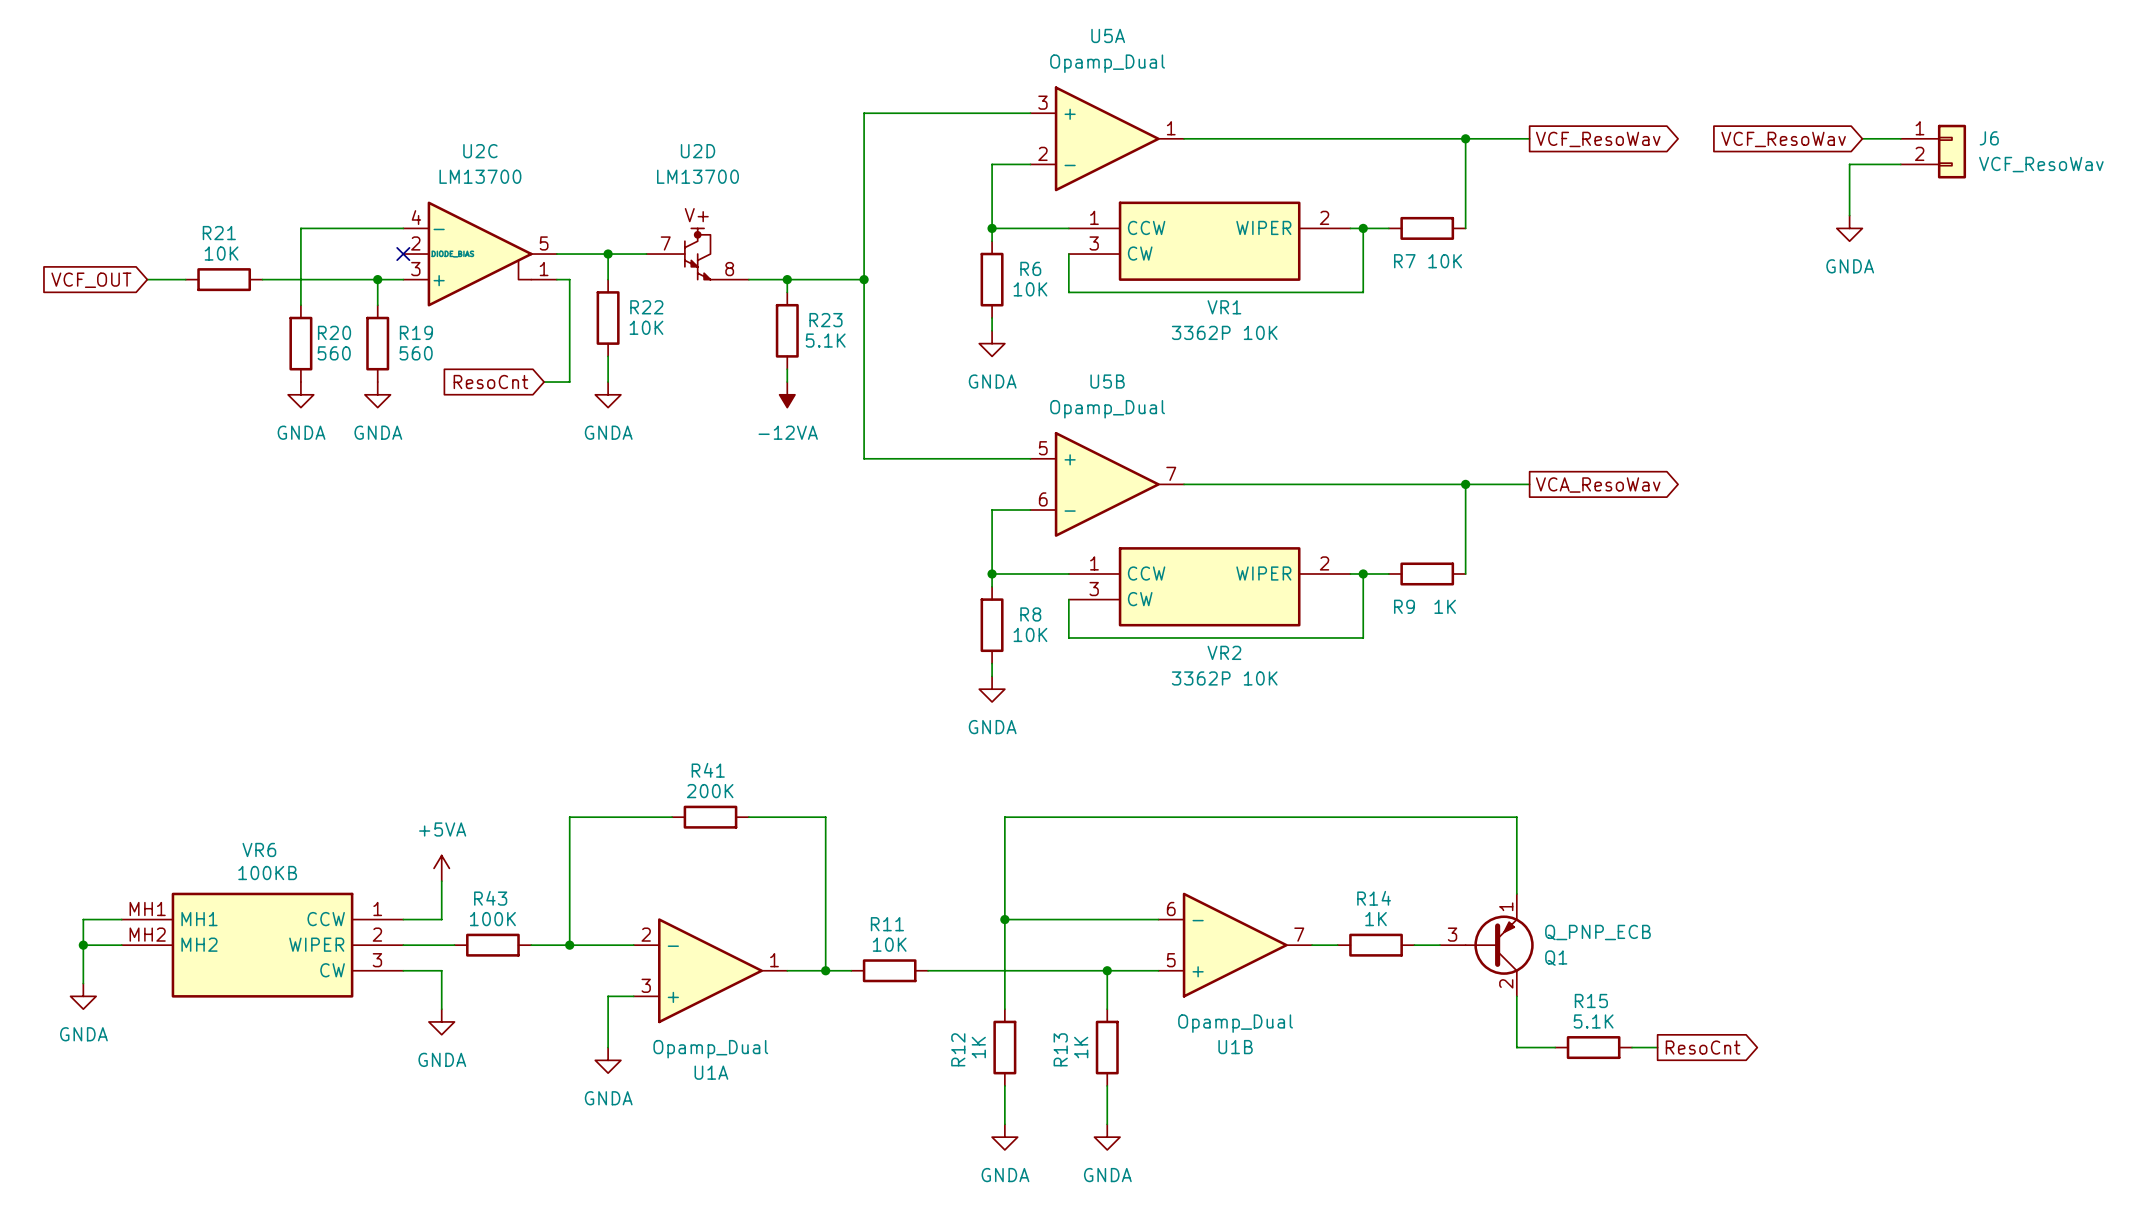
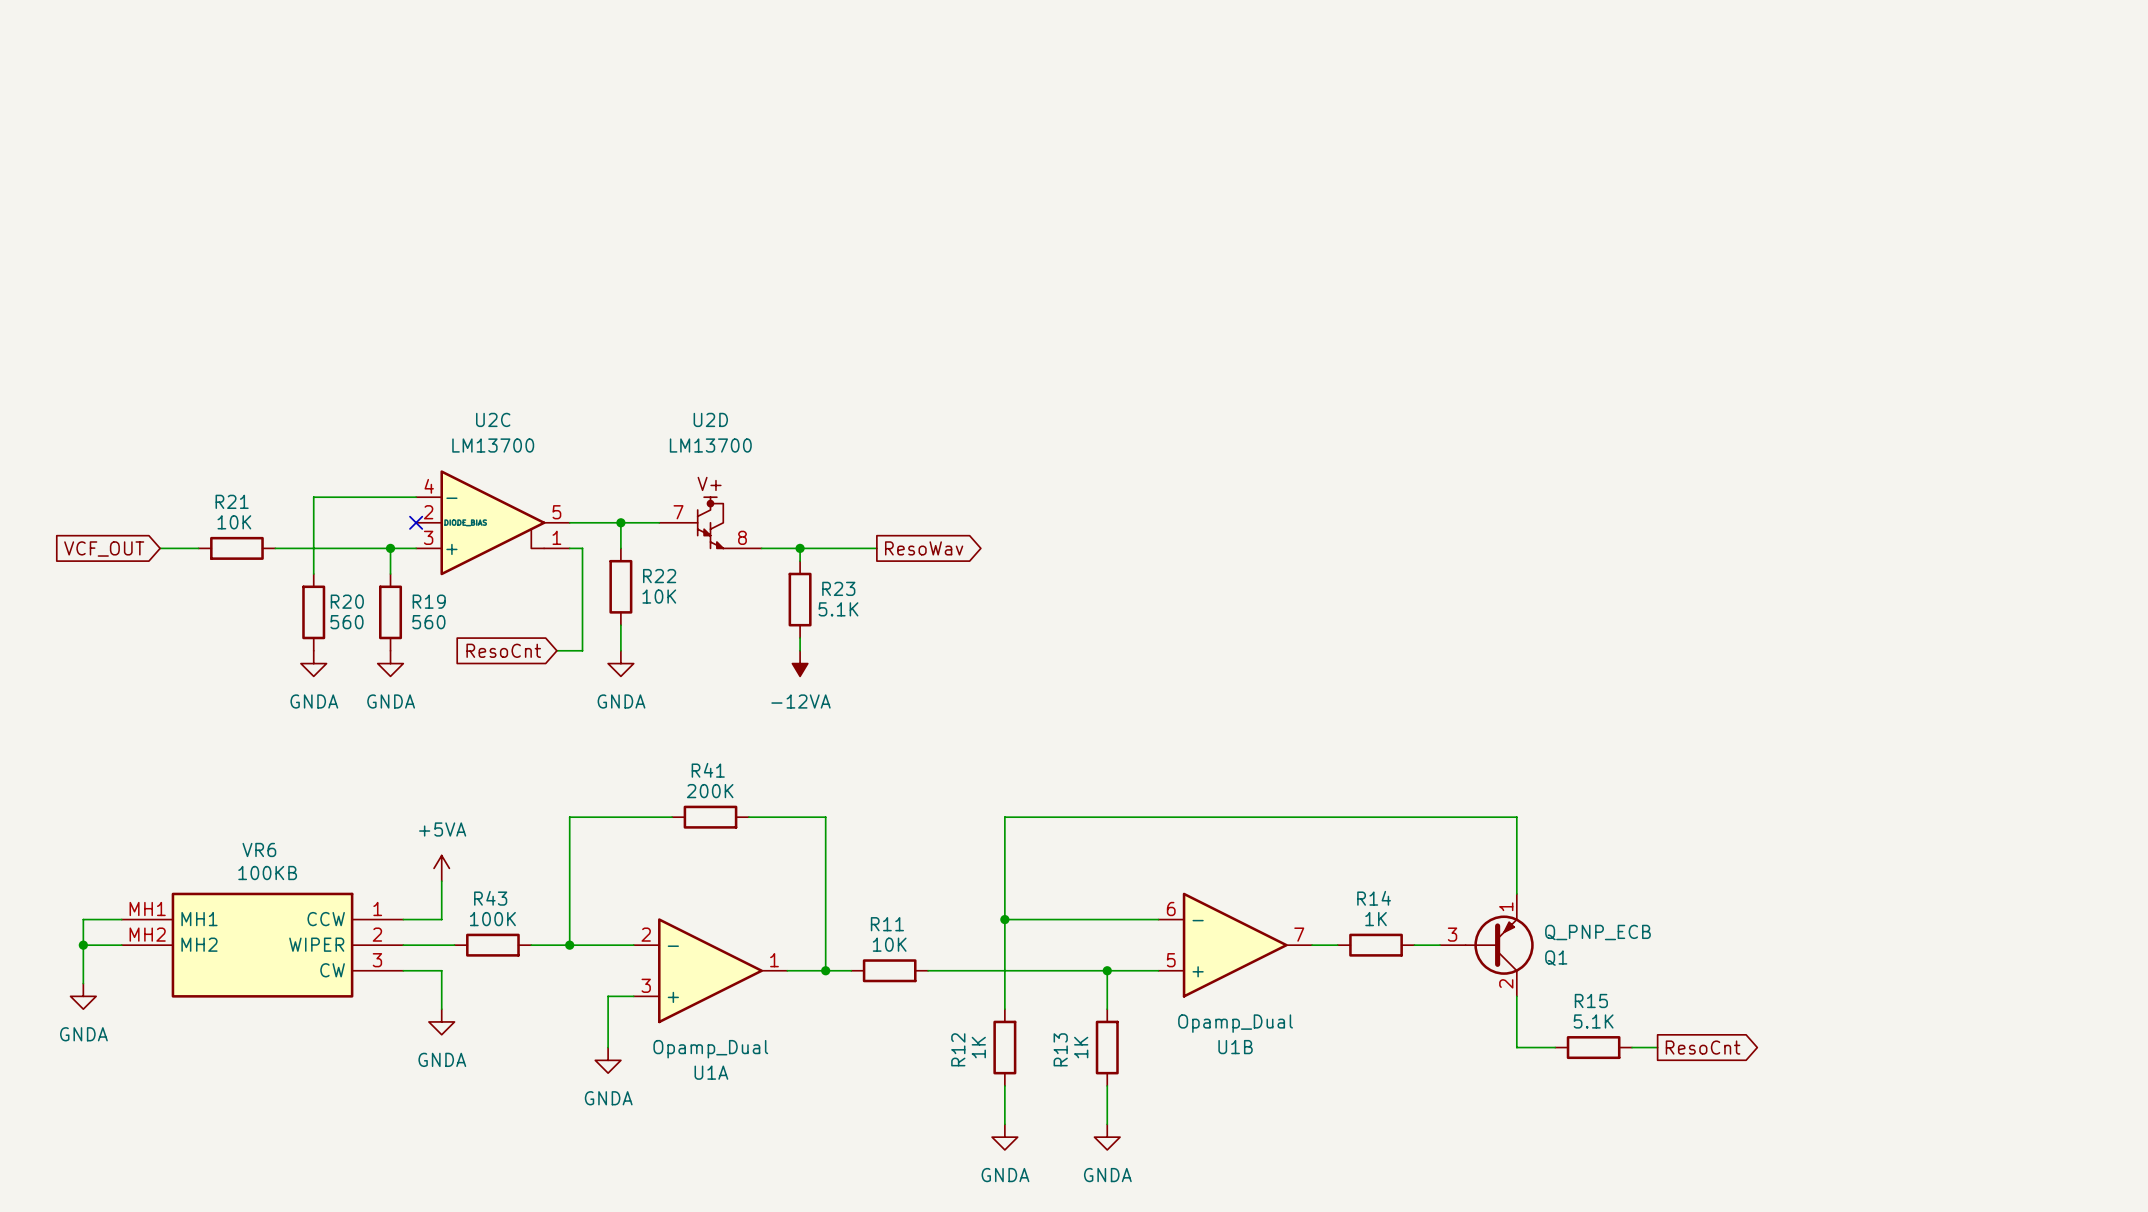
wire: (1030, 113) (864, 113) (864, 458) (1030, 458) -> none
U5A: Opamp_Dual (1107, 138) -> none
wire: (1184, 138) (1529, 138) -> none
wire: (1465, 138) (1465, 228) -> none
junction: (1465, 138) -> none
wire: (1862, 138) (1900, 138) -> none
global label: VCF_ResoWav (1598, 139) -> none
global label: VCF_ResoWav (1783, 139) -> none
J6: VCF_ResoWav (1933, 151) -> none
wire: (1030, 164) (992, 164) (992, 241) -> none
wire: (1900, 164) (1849, 164) (1849, 215) -> none
wire: (403, 228) (300, 228) (300, 305) -> none
wire: (992, 228) (1068, 228) -> none
junction: (992, 228) -> none
wire: (1350, 228) (1388, 228) -> none
wire: (1363, 228) (1363, 292) (1068, 292) (1068, 254) -> none
junction: (1363, 228) -> none
R7: 10K (1427, 228) -> none
power symbol: GNDA (1849, 228) -> none
VR1: 3362P 10K (1209, 241) -> none
no-connect mark: (403, 254) -> none
U2C position: (480, 254) -> (492, 522)
wire: (556, 254) (646, 254) -> none
wire: (608, 254) (608, 279) -> none
junction: (608, 254) -> none
U2D position: (697, 254) -> (710, 522)
wire: (147, 279) (185, 279) -> none
R21 position: (224, 279) -> (236, 548)
wire: (262, 279) (403, 279) -> none
wire: (377, 279) (377, 305) -> none
junction: (377, 279) -> none
wire: (556, 279) (569, 279) (569, 382) (544, 382) -> none
wire: (748, 279) (864, 279) -> none
wire: (787, 279) (787, 292) -> none
junction: (787, 279) -> none
junction: (864, 279) -> none
R6: 10K (992, 279) -> none
global label: VCF_OUT (91, 280) -> none
R22 position: (608, 318) -> (620, 586)
wire: (992, 318) (992, 330) -> none
R23 position: (787, 330) -> (800, 599)
R20 position: (300, 343) -> (313, 612)
R19 position: (377, 343) -> (390, 612)
power symbol: GNDA (992, 343) -> none
wire: (608, 356) (608, 382) -> (620, 522) (620, 548)
wire: (787, 369) (787, 382) -> (800, 548) (800, 561)
global label: ResoCnt (490, 382) -> none
power symbol: GNDA (300, 394) -> none
power symbol: GNDA (377, 394) -> none
power symbol: GNDA (608, 394) -> none
power symbol: -12VA (787, 394) -> none
U5B: Opamp_Dual (1107, 484) -> none
wire: (1184, 484) (1529, 484) -> none
wire: (1465, 484) (1465, 573) -> none
junction: (1465, 484) -> none
global label: VCA_ResoWav (1598, 485) -> none
wire: none -> (416, 497) (313, 497) (313, 573)
wire: (1030, 510) (992, 510) (992, 586) -> none
no-connect mark: none -> (416, 522)
wire: none -> (569, 522) (659, 522)
junction: none -> (620, 522)
wire: none -> (160, 548) (198, 548)
wire: none -> (275, 548) (416, 548)
wire: none -> (390, 548) (390, 573)
junction: none -> (390, 548)
wire: none -> (569, 548) (582, 548) (582, 650) (556, 650)
wire: none -> (761, 548) (876, 548)
junction: none -> (800, 548)
global label: none -> ResoWav (924, 548)
global label: none -> VCF_OUT (104, 549)
wire: (992, 573) (1068, 573) -> none
junction: (992, 573) -> none
wire: (1350, 573) (1388, 573) -> none
wire: (1363, 573) (1363, 637) (1068, 637) (1068, 599) -> none
junction: (1363, 573) -> none
R9: 1K (1427, 573) -> none
VR2: 3362P 10K (1209, 586) -> none
wire: none -> (620, 625) (620, 650)
R8: 10K (992, 625) -> none
global label: none -> ResoCnt (503, 650)
power symbol: none -> GNDA (313, 663)
power symbol: none -> GNDA (390, 663)
power symbol: none -> GNDA (620, 663)
power symbol: none -> -12VA (800, 663)
wire: (992, 663) (992, 676) -> (800, 637) (800, 650)
power symbol: GNDA (992, 689) -> none

